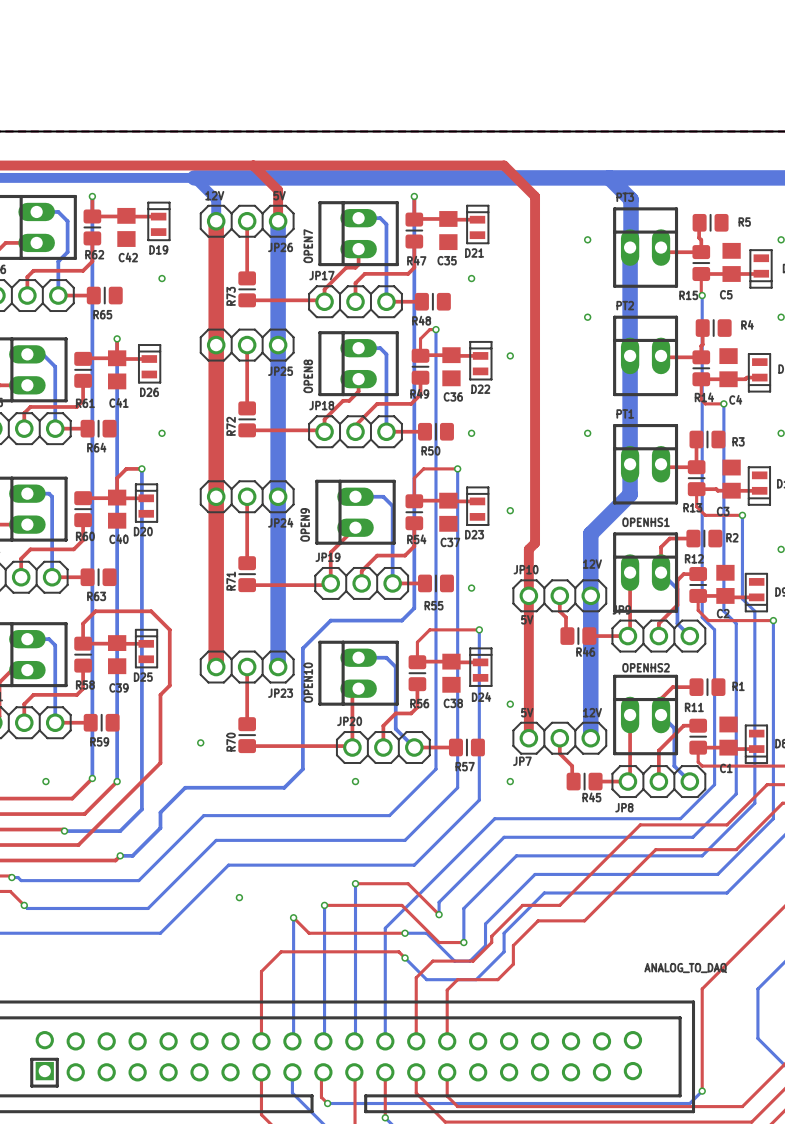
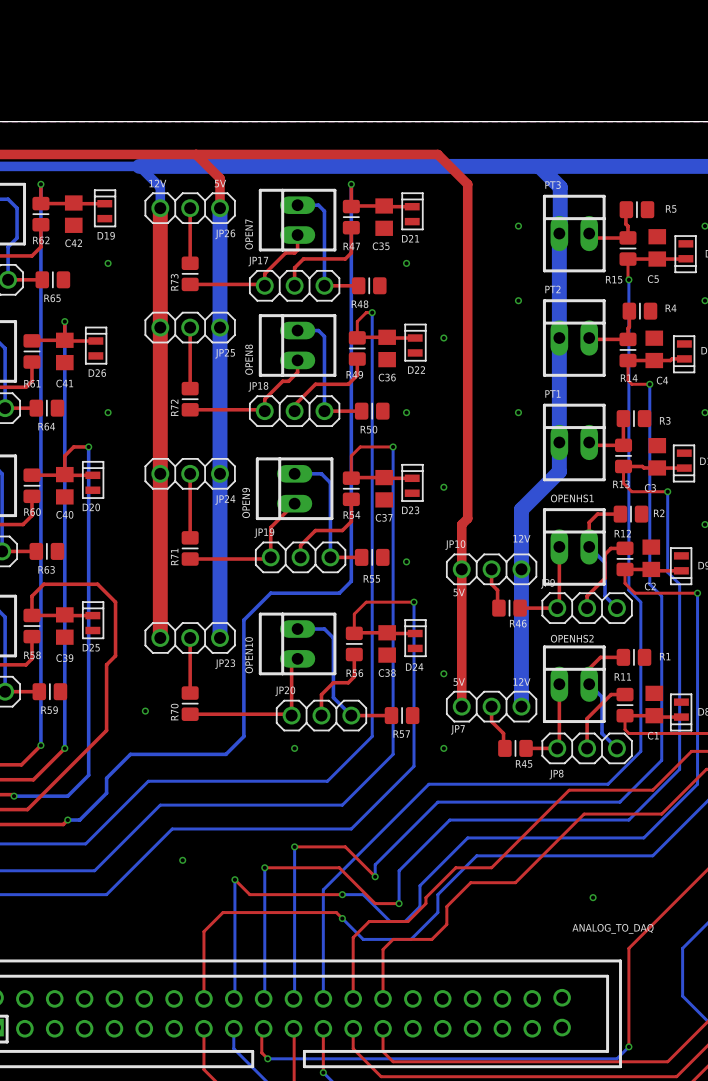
via: none -> (593, 897)

